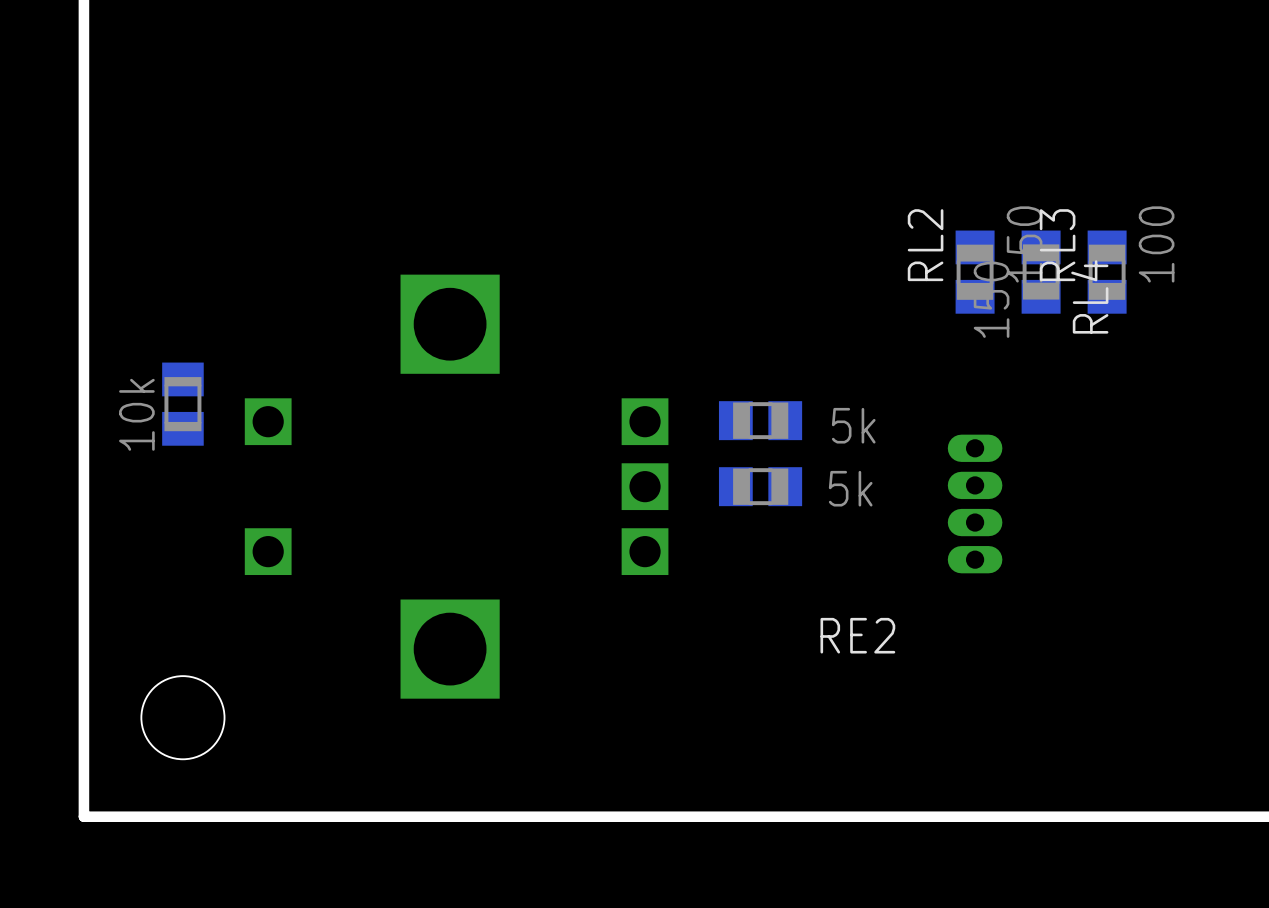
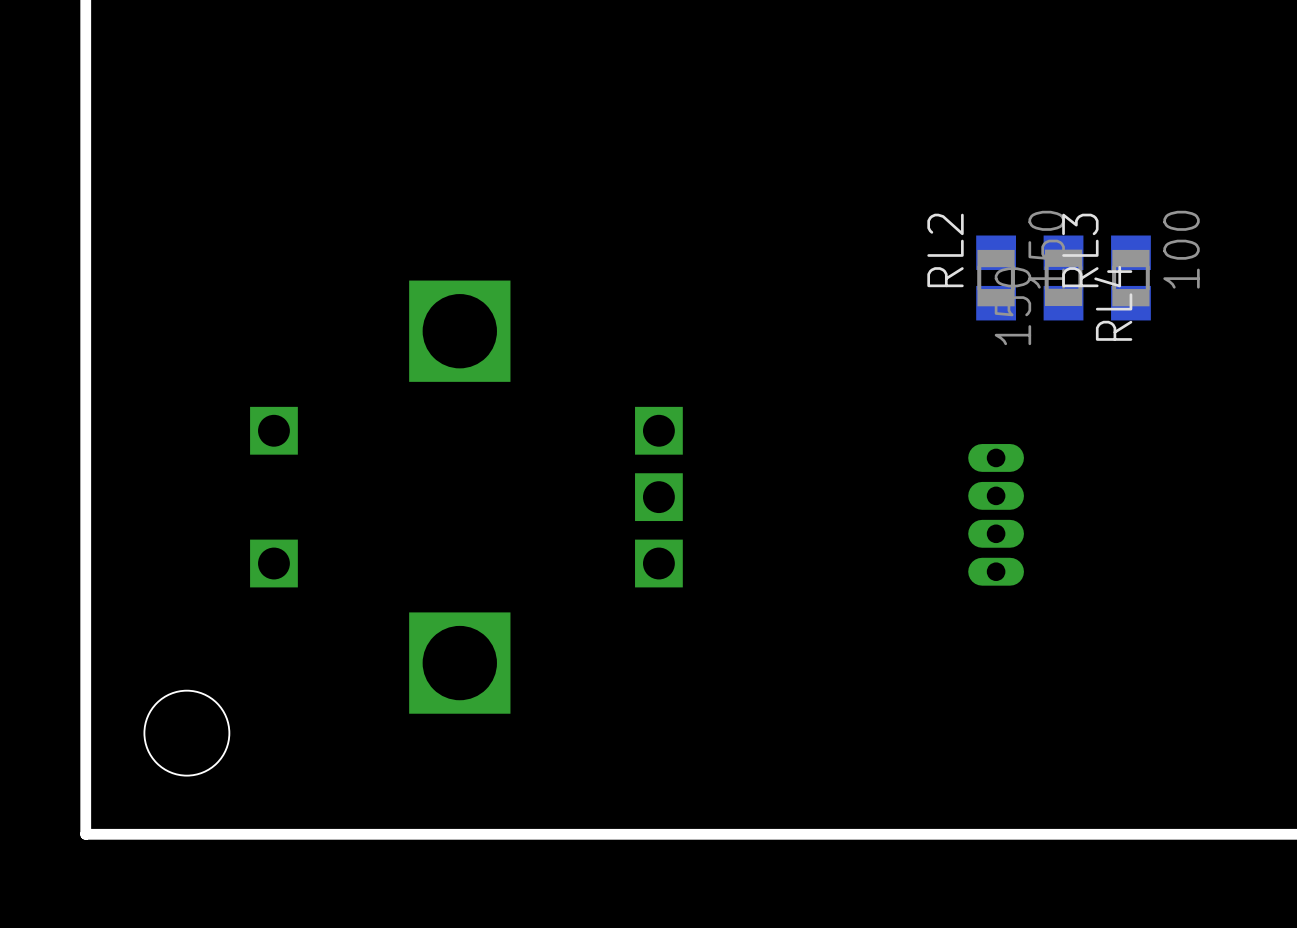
part: 10k (182, 404) -> none
part: 5k (760, 420) -> none
RE2: 5k (760, 486) -> none

